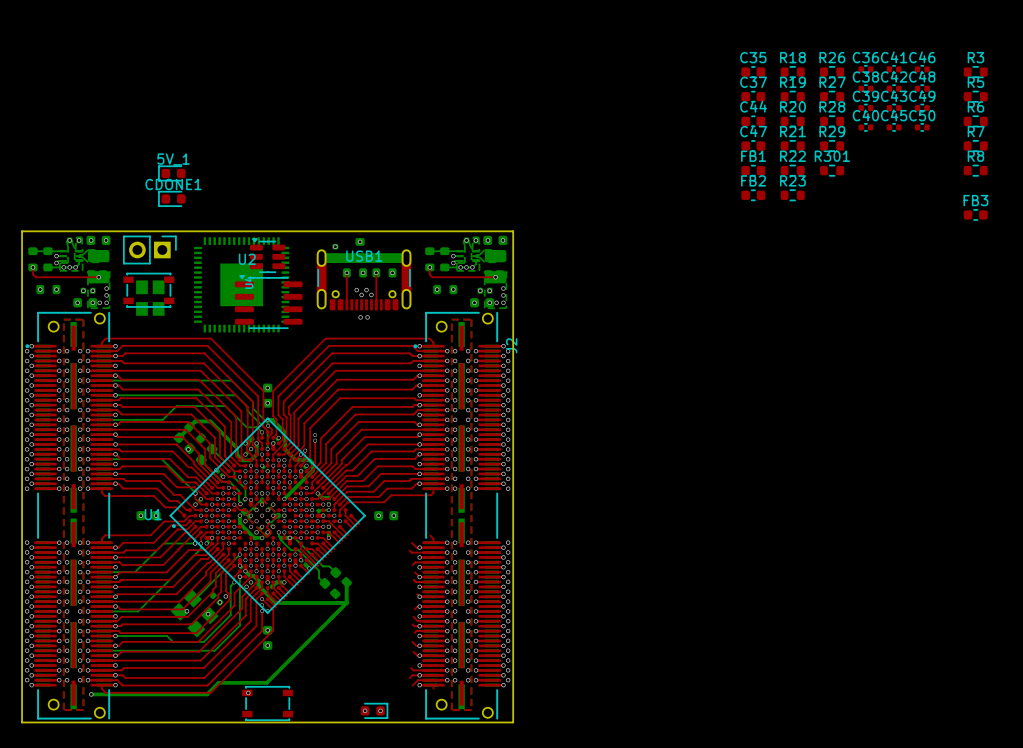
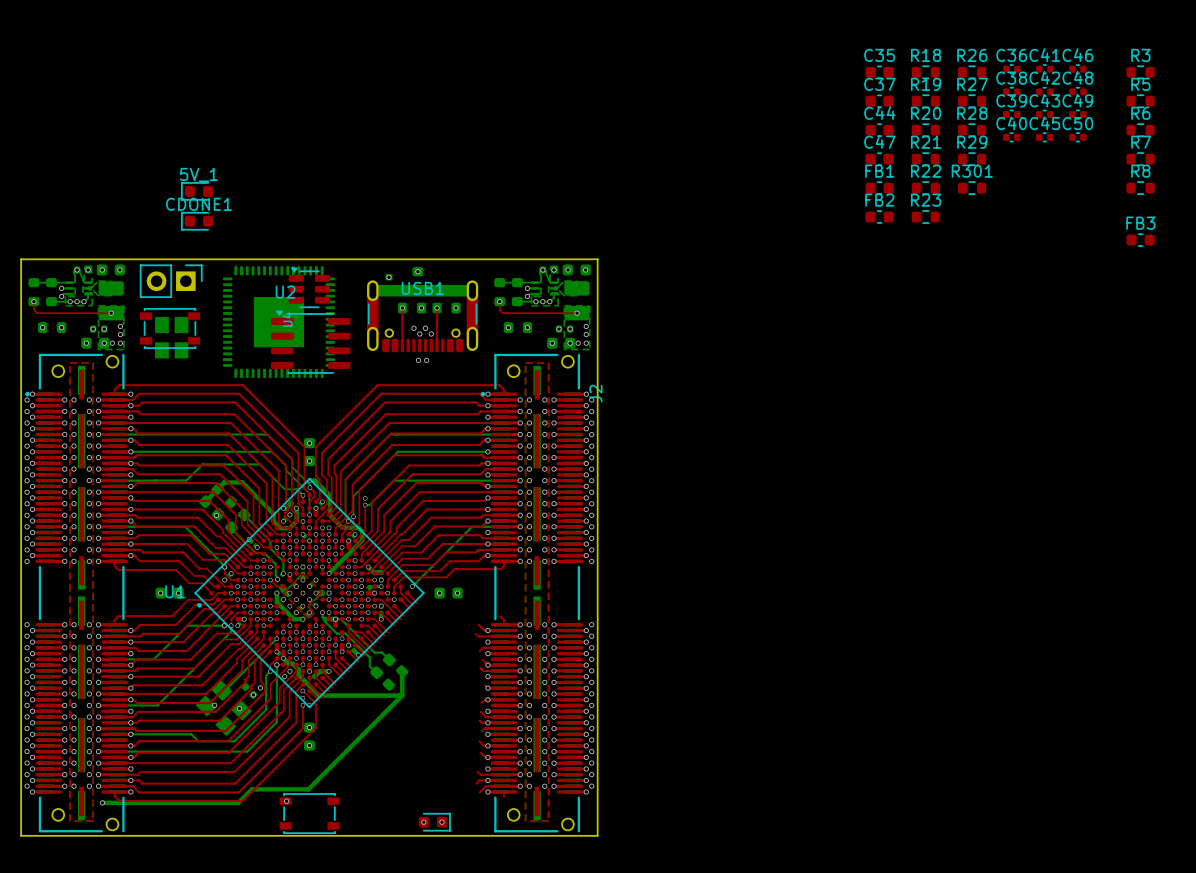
bottom track: none -> (501, 434) (390, 434) (345, 479) (345, 518) (348, 521)
bottom track: none -> (487, 451) (397, 451) (353, 496) (353, 516)
bottom track: none -> (501, 480) (393, 480) (369, 505) (365, 505)
bottom track: none -> (501, 526) (472, 526) (412, 586)
via: none -> (412, 586)

